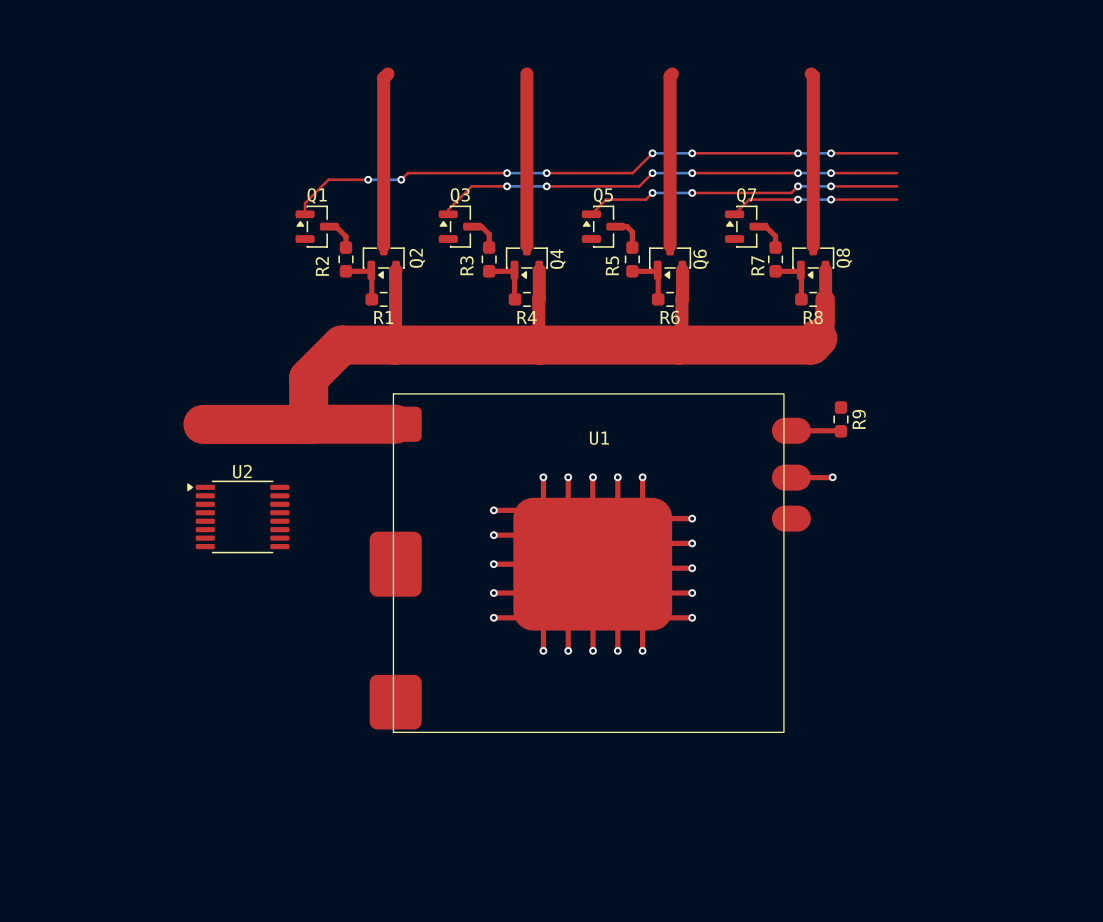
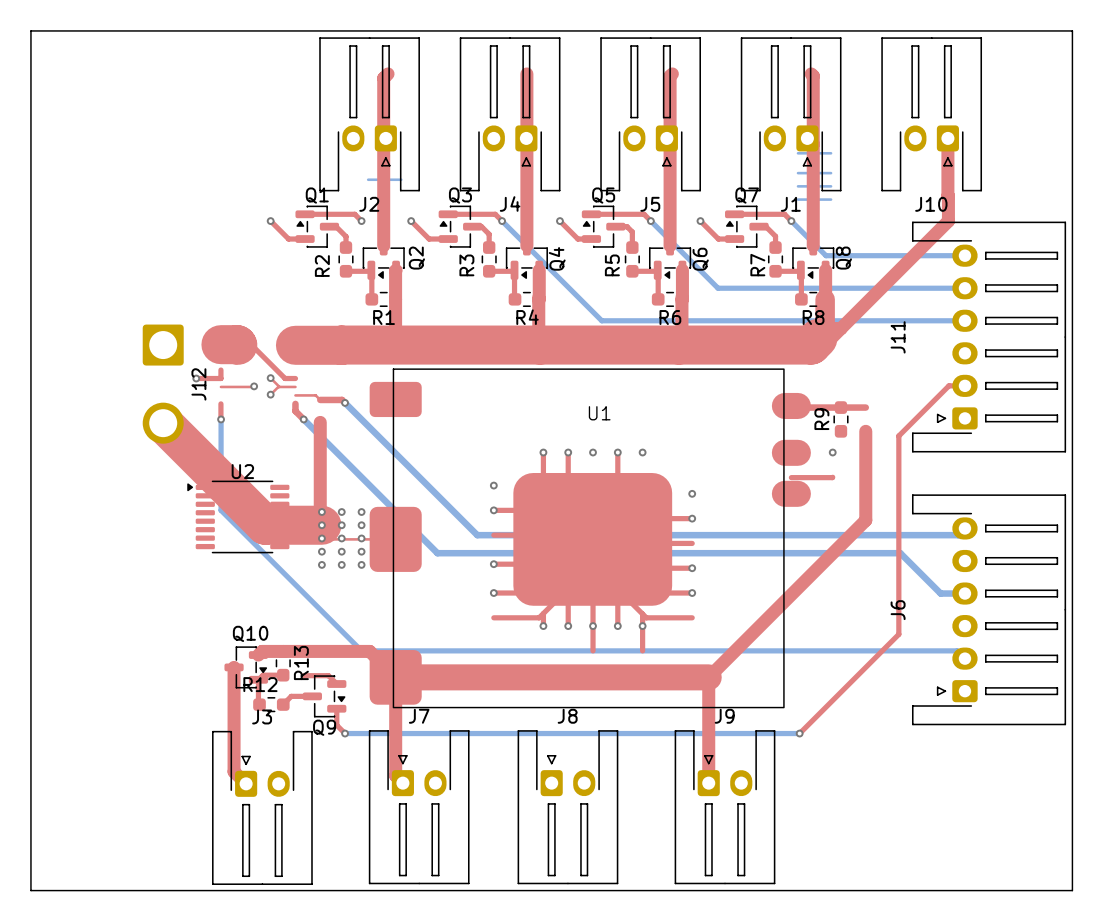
board edge: none -> (30, 30) (1072, 30) (1072, 890) (30, 890) (30, 30)
J2: none -> (369, 114)
J4: none -> (510, 114)
J5: none -> (650, 114)
J1: none -> (791, 114)
J10: none -> (931, 114)
top track: none -> (947, 138) (948, 221) (831, 338) (817, 338)
top track: (652, 153) (632, 173) (546, 173) -> none
bottom track: (652, 153) (692, 153) -> none
via: (652, 153) -> none
top track: (692, 153) (798, 153) -> none
via: (692, 153) -> none
via: (798, 153) -> none
top track: (831, 153) (897, 153) -> none
via: (831, 153) -> none
top track: (507, 173) (407, 173) (401, 179) -> none
bottom track: (507, 173) (546, 173) -> none
via: (507, 173) -> none
via: (546, 173) -> none
top track: (652, 173) (639, 186) (546, 186) -> none
bottom track: (652, 173) (692, 173) -> none
via: (652, 173) -> none
top track: (692, 173) (798, 173) -> none
via: (692, 173) -> none
via: (798, 173) -> none
top track: (831, 173) (897, 173) -> none
via: (831, 173) -> none
top track: (368, 179) (328, 179) (305, 203) (305, 214) -> (361, 221) (354, 214) (305, 214)
via: (368, 179) -> none
via: (401, 179) -> none
top track: (507, 186) (471, 186) (448, 209) (448, 214) -> (502, 221) (495, 214) (448, 214)
bottom track: (507, 186) (546, 186) -> none
via: (507, 186) -> none
via: (546, 186) -> none
top track: (798, 186) (791, 192) (692, 192) -> none
via: (798, 186) -> none
top track: (831, 186) (897, 186) -> none
via: (831, 186) -> none
top track: (652, 192) (645, 199) (606, 199) (591, 214) -> (650, 221) (644, 214) (591, 214)
bottom track: (652, 192) (692, 192) -> none
via: (652, 192) -> none
via: (692, 192) -> none
top track: (798, 199) (749, 199) (734, 214) -> (791, 221) (784, 214) (734, 214)
via: (798, 199) -> none
top track: (831, 199) (897, 199) -> none
via: (831, 199) -> none
top track: none -> (270, 221) (288, 239) (305, 239)
via: none -> (270, 221)
via: none -> (361, 221)
top track: none -> (411, 221) (429, 239) (448, 239)
via: none -> (411, 221)
bottom track: none -> (502, 221) (601, 320) (964, 320)
via: none -> (502, 221)
top track: none -> (559, 221) (577, 239) (591, 239)
via: none -> (559, 221)
bottom track: none -> (650, 221) (718, 288) (964, 288)
via: none -> (650, 221)
top track: none -> (700, 221) (718, 239) (734, 239)
via: none -> (700, 221)
bottom track: none -> (791, 221) (826, 255) (964, 255)
via: none -> (791, 221)
J11: none -> (989, 337)
top track: none -> (220, 344) (251, 345) (285, 378) (295, 378)
top track: (341, 345) (308, 378) (308, 424) (202, 424) -> (341, 345) (295, 345)
top track: none -> (220, 370) (220, 378) (196, 378)
via: none -> (196, 378)
top track: none -> (270, 378) (279, 386)
via: none -> (270, 378)
J12: none -> (163, 384)
top track: none -> (964, 385) (948, 385) (898, 435) (898, 634) (799, 733)
top track: none -> (254, 386) (220, 386)
via: none -> (254, 386)
top track: none -> (295, 386) (278, 386) (270, 394)
via: none -> (270, 394)
top track: none -> (295, 395) (315, 395) (320, 399) (342, 399) (345, 402)
bottom track: none -> (345, 402) (477, 535) (958, 535) (964, 528)
via: none -> (345, 402)
top track: none -> (220, 403) (220, 419)
top track: none -> (295, 403) (295, 411) (303, 419)
top track: none -> (791, 405) (792, 407) (865, 407)
bottom track: none -> (221, 419) (221, 510) (361, 650) (957, 650) (964, 658)
via: none -> (221, 419)
bottom track: none -> (303, 419) (437, 553) (900, 553) (940, 593) (964, 593)
via: none -> (303, 419)
R9 name position: R9 (859, 419) -> R9 (821, 419)
top track: none -> (320, 422) (320, 536) (322, 539) (395, 539)
top track: none -> (163, 423) (265, 525) (321, 525)
top track: (308, 424) (395, 424) -> none
top track: (791, 430) (840, 431) -> none
top track: none -> (865, 431) (865, 520) (708, 677)
via: none -> (543, 452)
via: none -> (568, 452)
via: none -> (593, 452)
via: none -> (617, 452)
via: none -> (642, 452)
via: (543, 477) -> none
via: (568, 477) -> none
via: (593, 477) -> none
via: (617, 477) -> none
via: (642, 477) -> none
via position: (832, 477) -> (832, 452)
via: none -> (493, 485)
via: none -> (692, 493)
via: none -> (321, 512)
via: none -> (341, 512)
via: none -> (361, 512)
via: none -> (321, 525)
via: none -> (341, 525)
via: none -> (361, 525)
via: (493, 535) -> none
via: none -> (321, 538)
via: none -> (341, 538)
via: none -> (361, 538)
via: (692, 543) -> none
via: none -> (321, 551)
via: none -> (341, 551)
via: none -> (361, 551)
U1 position: (590, 563) -> (590, 538)
via: none -> (321, 564)
via: none -> (341, 564)
via: none -> (361, 564)
J6: none -> (989, 609)
via: (493, 617) -> none
via: (692, 617) -> none
top track: (543, 626) (543, 650) -> (543, 452) (543, 477)
via: none -> (543, 626)
top track: (568, 626) (568, 650) -> (568, 452) (568, 477)
via: none -> (568, 626)
via: none -> (593, 626)
top track: (617, 626) (617, 650) -> (617, 452) (617, 477)
via: none -> (617, 626)
via: none -> (642, 626)
via: (543, 650) -> none
via: (568, 650) -> none
via: (593, 650) -> none
via: (617, 650) -> none
via: (642, 650) -> none
top track: none -> (266, 655) (258, 655) (262, 651) (369, 651) (395, 677)
R13: none -> (283, 663)
top track: none -> (234, 667) (234, 771) (246, 783)
Q10: none -> (246, 667)
top track: none -> (283, 675) (263, 675) (258, 679) (259, 704)
top track: none -> (303, 675) (328, 675) (336, 683)
top track: none -> (395, 677) (395, 775) (402, 783)
top track: none -> (395, 677) (708, 677)
top track: none -> (708, 677) (708, 783)
top track: none -> (312, 696) (291, 696) (283, 704)
Q9: none -> (324, 696)
R12: none -> (271, 704)
top track: none -> (336, 708) (336, 725) (345, 733)
bottom track: none -> (345, 733) (799, 733)
via: none -> (345, 733)
via: none -> (799, 733)
J3: none -> (262, 807)
J7: none -> (419, 807)
J8: none -> (567, 807)
J9: none -> (725, 807)

